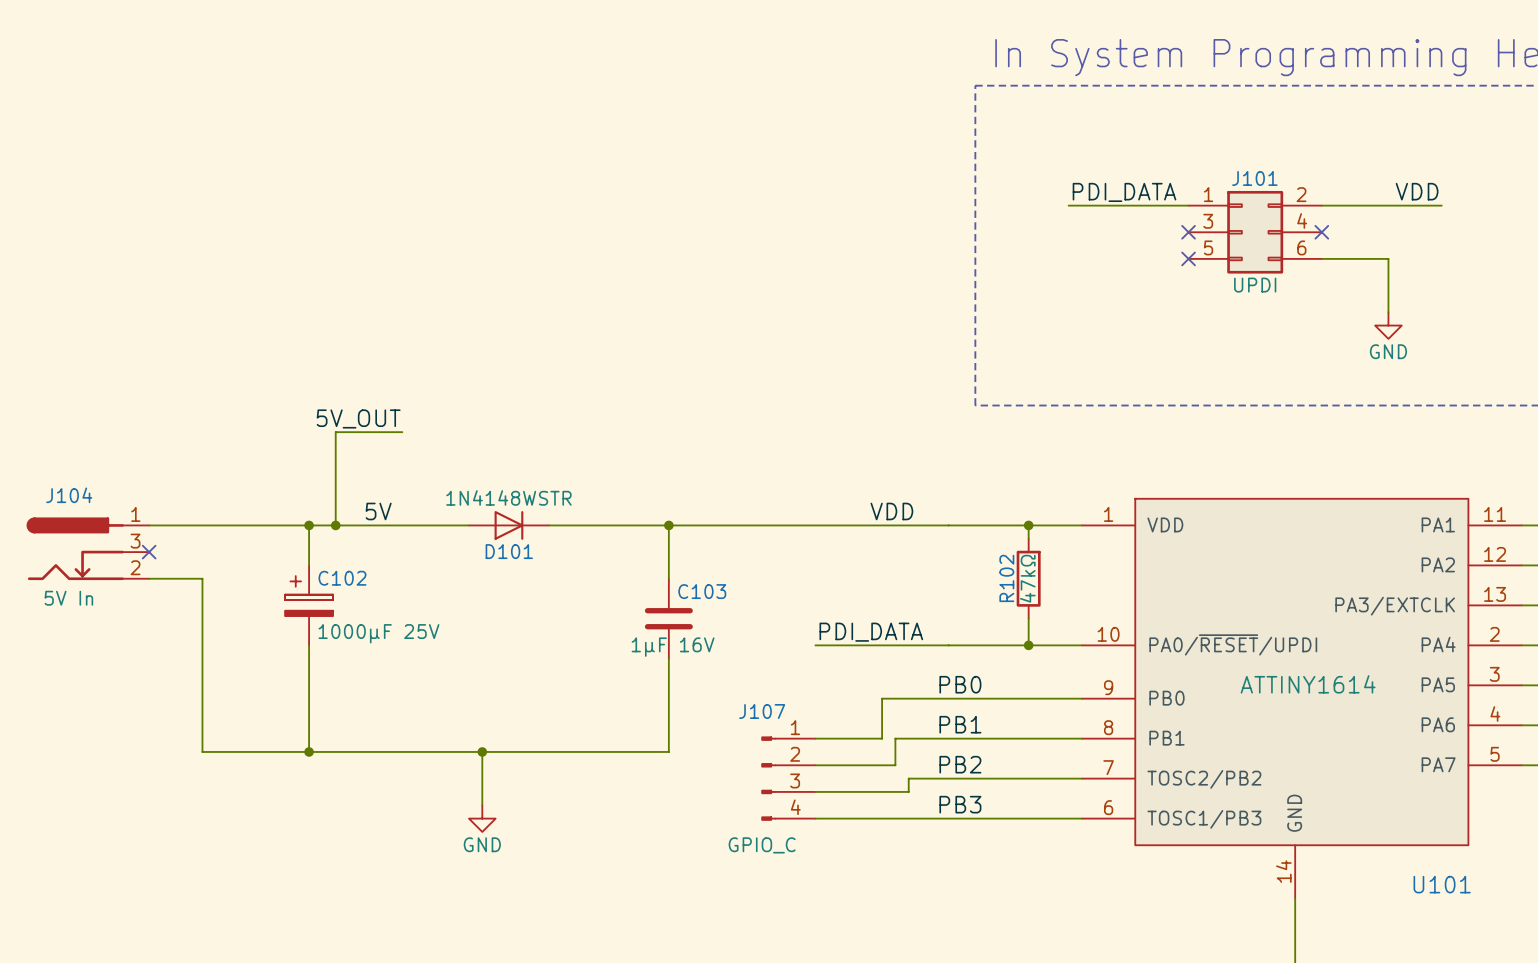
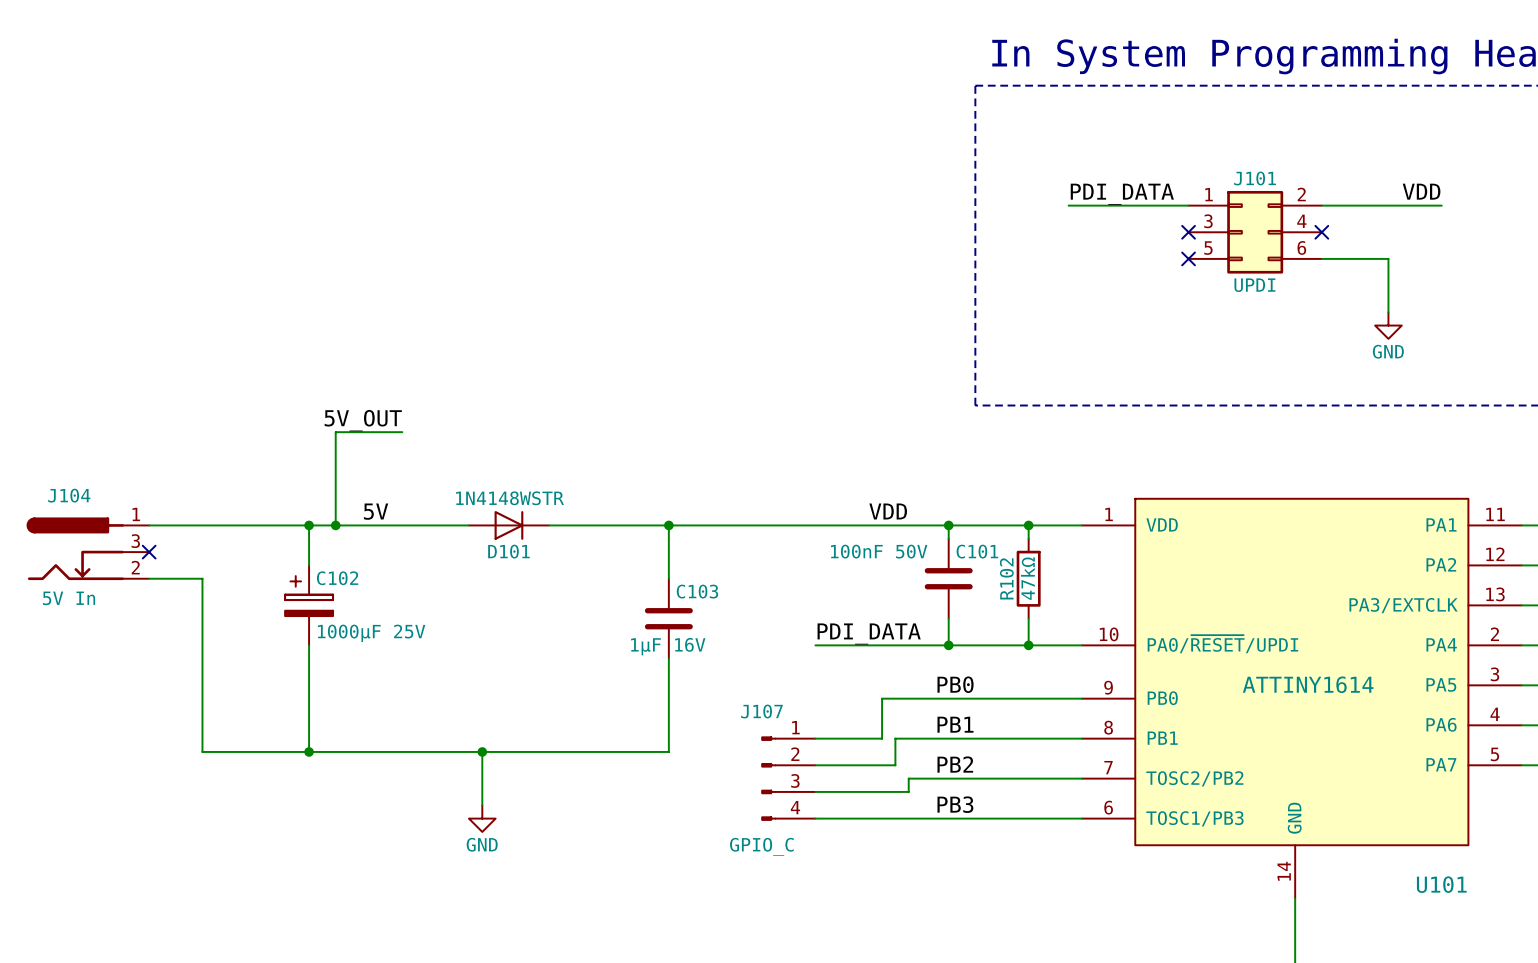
wire: none -> (948, 525) (948, 538)
junction: none -> (948, 525)
C101: none -> 100nF 50V (948, 578)
wire: none -> (948, 618) (948, 645)
junction: none -> (948, 645)

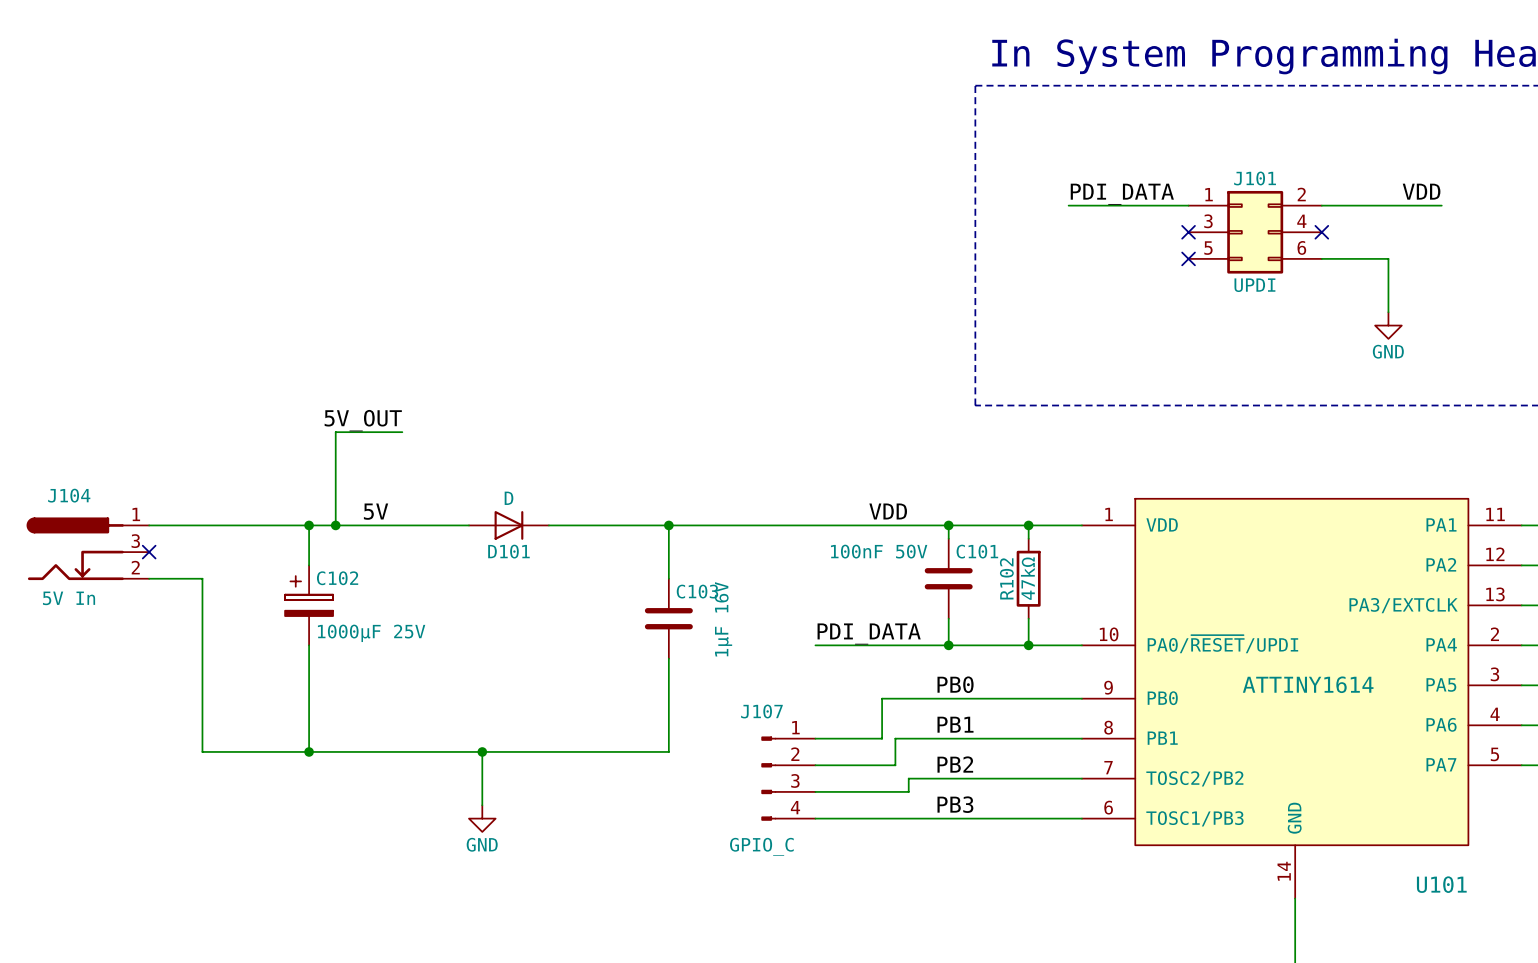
D101 value: 1N4148WSTR (510, 498) -> D (509, 498)
C103 value rotation: 0° (668, 646) -> 90° counterclockwise (723, 619)

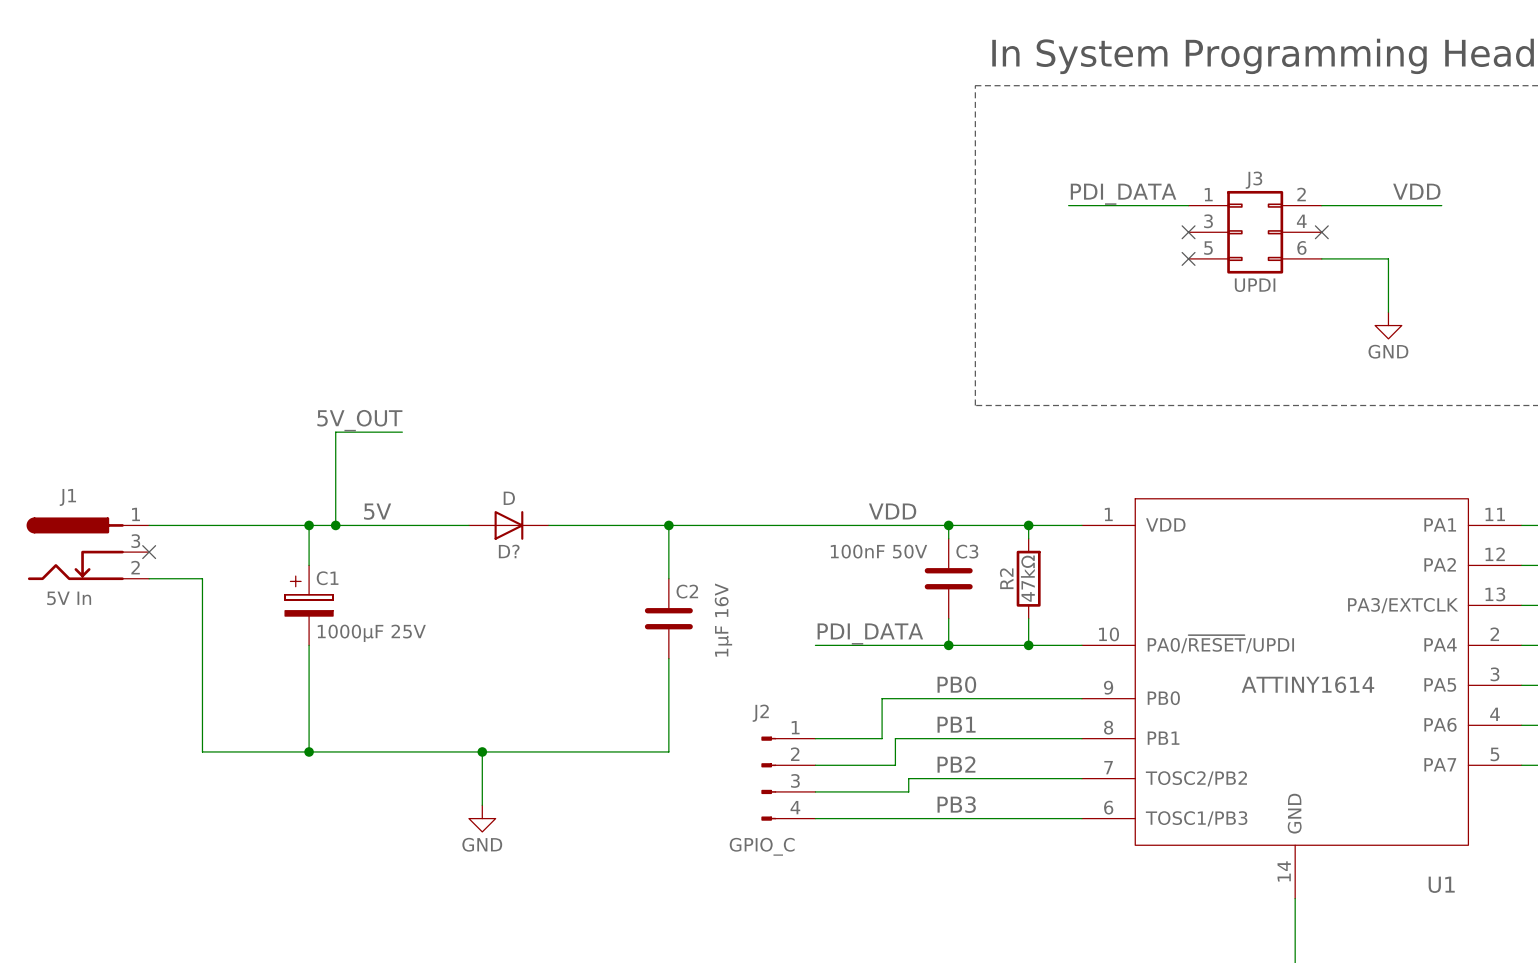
J101 name: J101 (1255, 178) -> J3 (1253, 180)
J104 name: J104 (69, 495) -> J1 (67, 497)
D101 name: D101 (508, 551) -> D? (509, 551)
C101 name: C101 (977, 551) -> C3 (967, 551)
C102 name: C102 (337, 578) -> C1 (327, 578)
R102 name: R102 (1006, 578) -> R2 (1006, 578)
C103 name: C103 (697, 591) -> C2 (687, 591)
J107 name: J107 (761, 711) -> J2 (760, 713)
U101 name: U101 (1441, 884) -> U1 (1441, 884)

